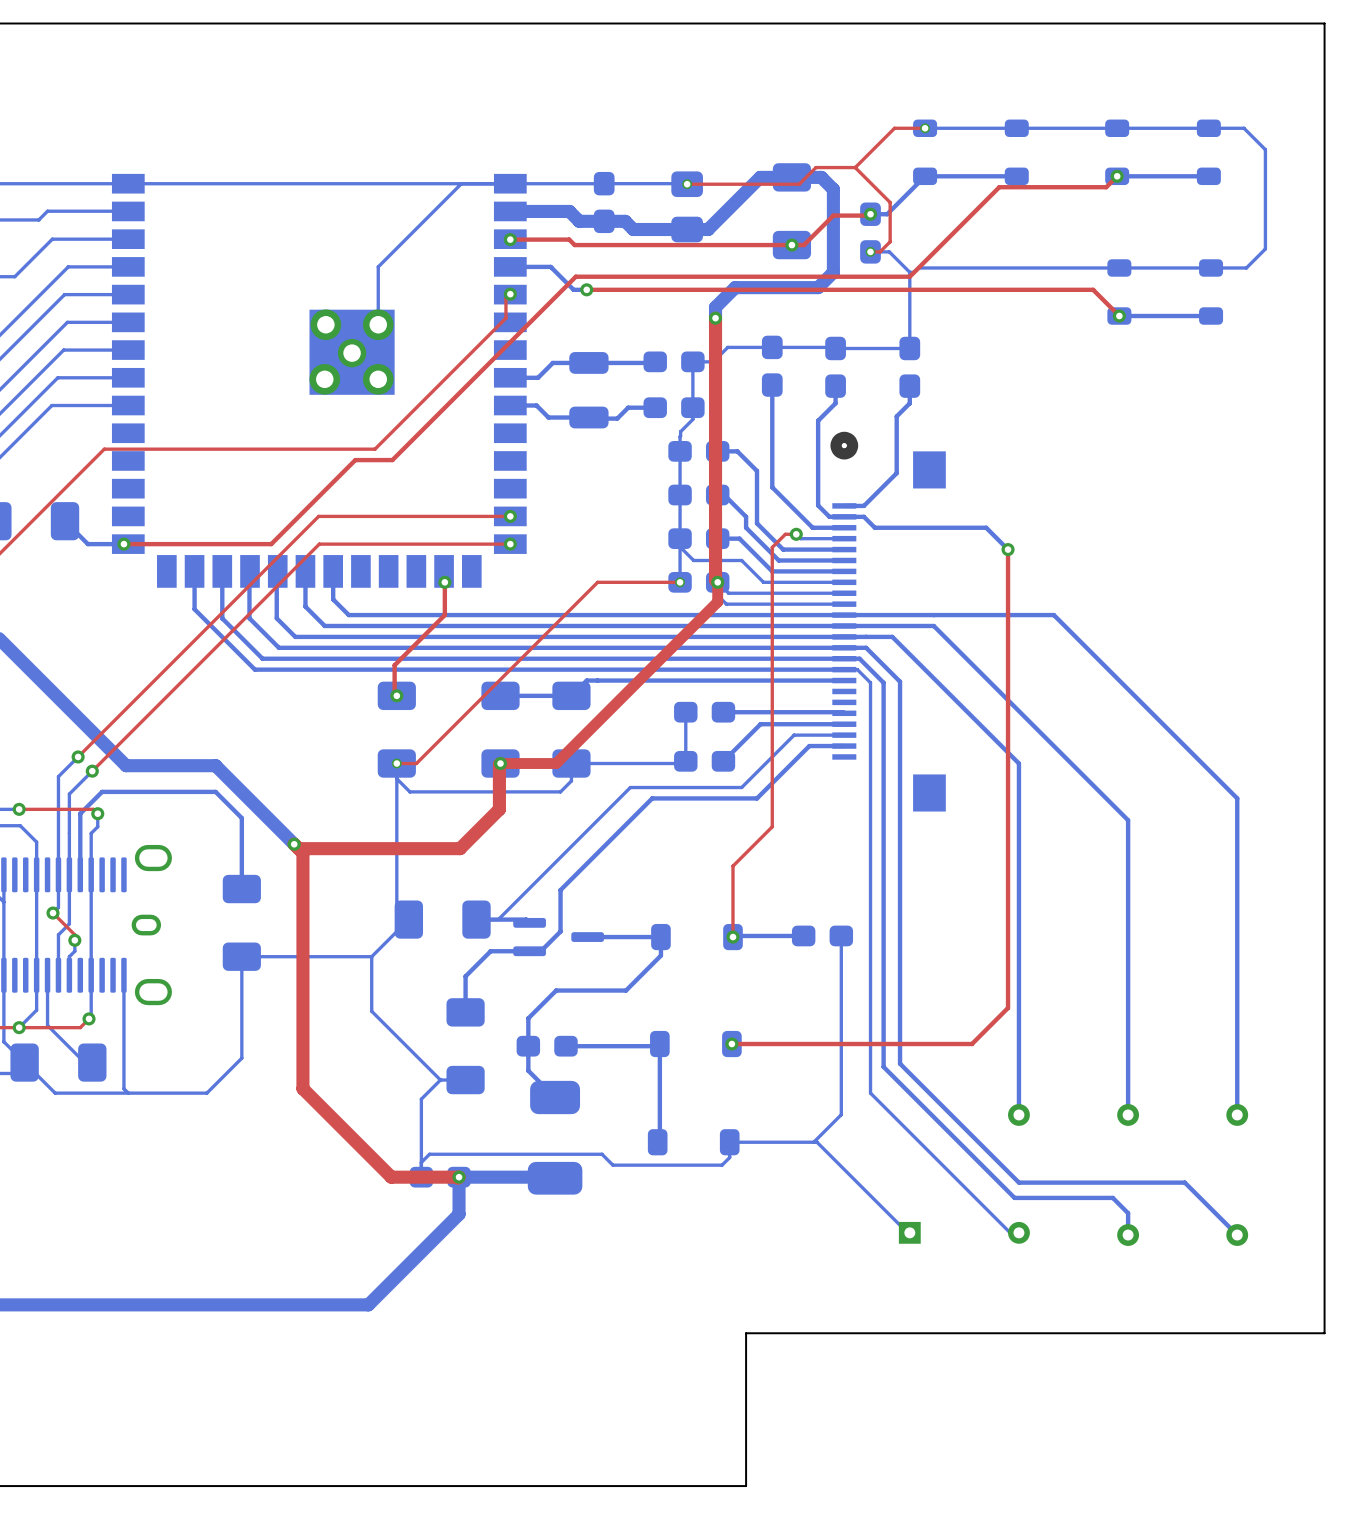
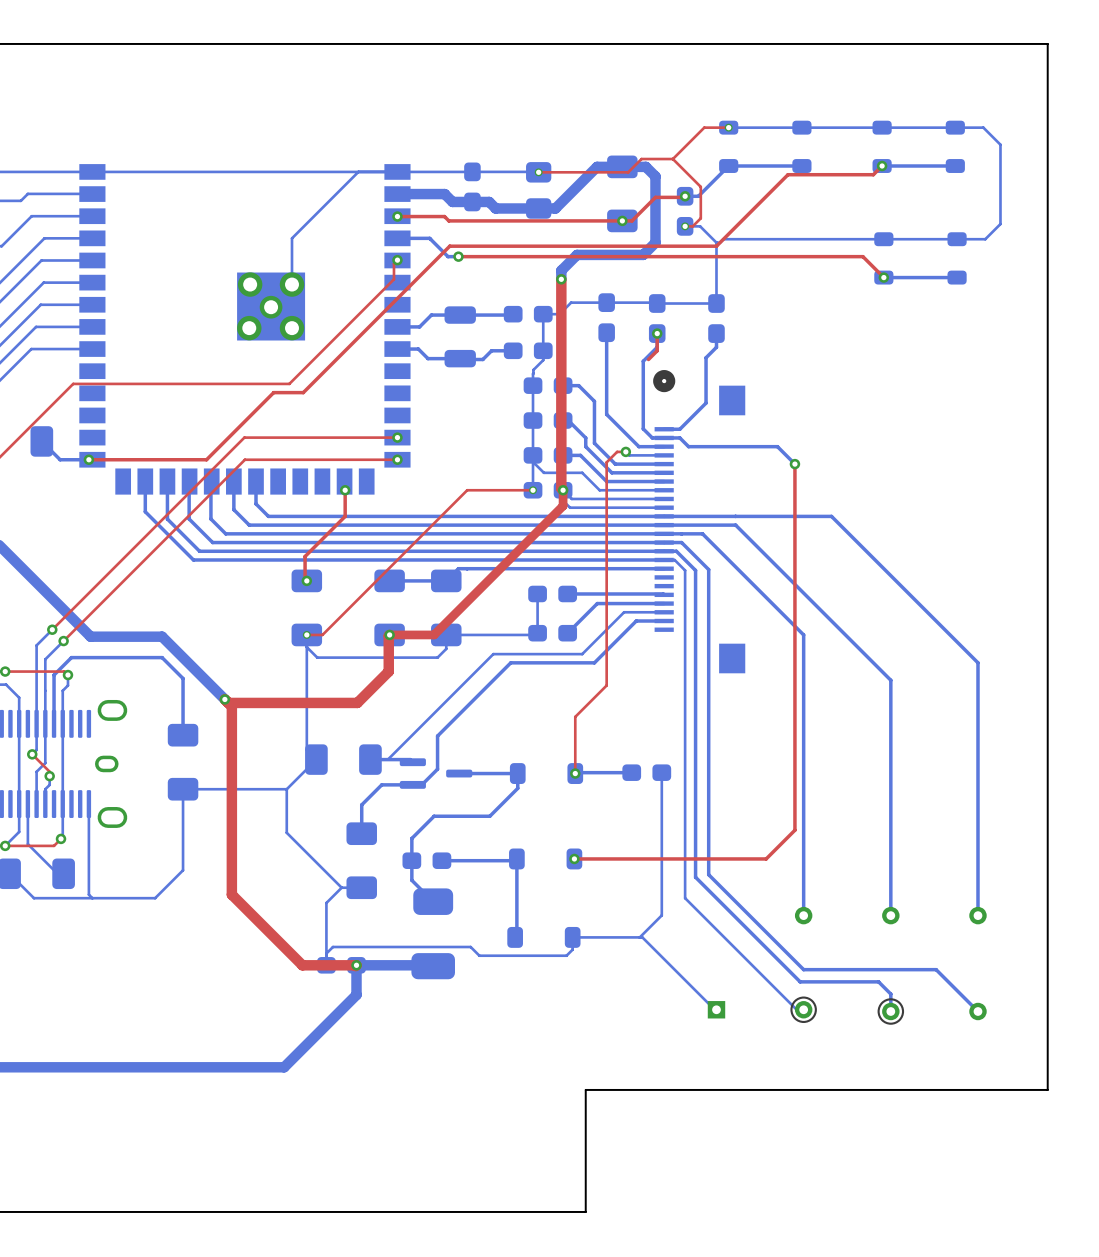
top track: none -> (657, 333) (657, 350) (648, 359)
via: none -> (657, 333)
part side: bottom (1018, 1232) -> top (803, 1009)
part side: bottom (1128, 1235) -> top (890, 1011)

